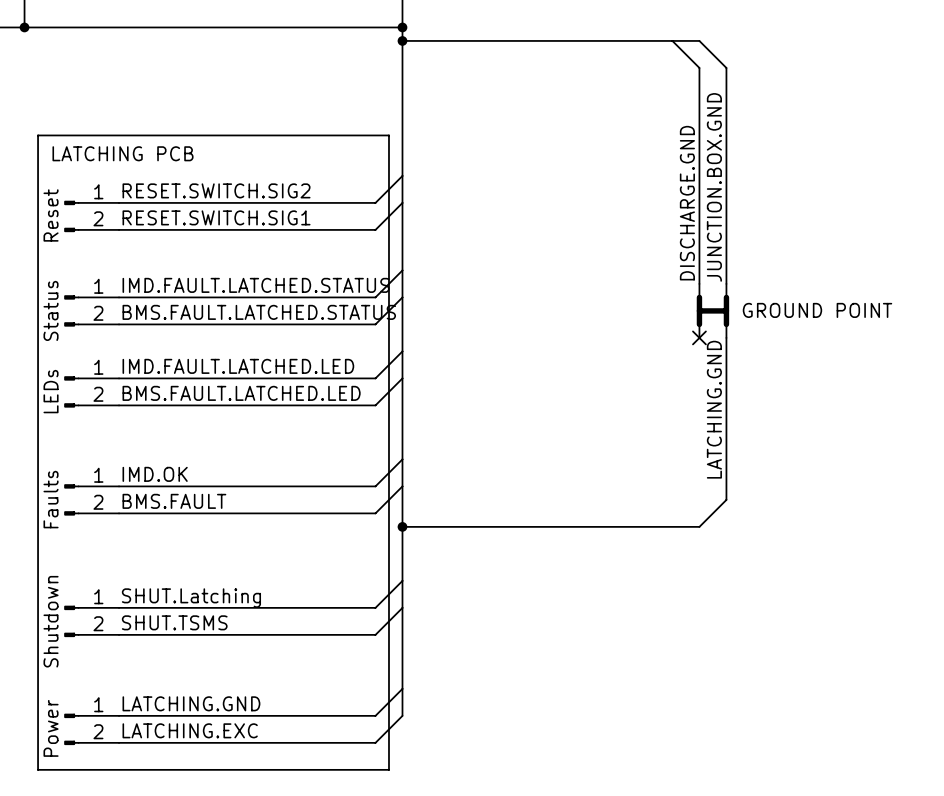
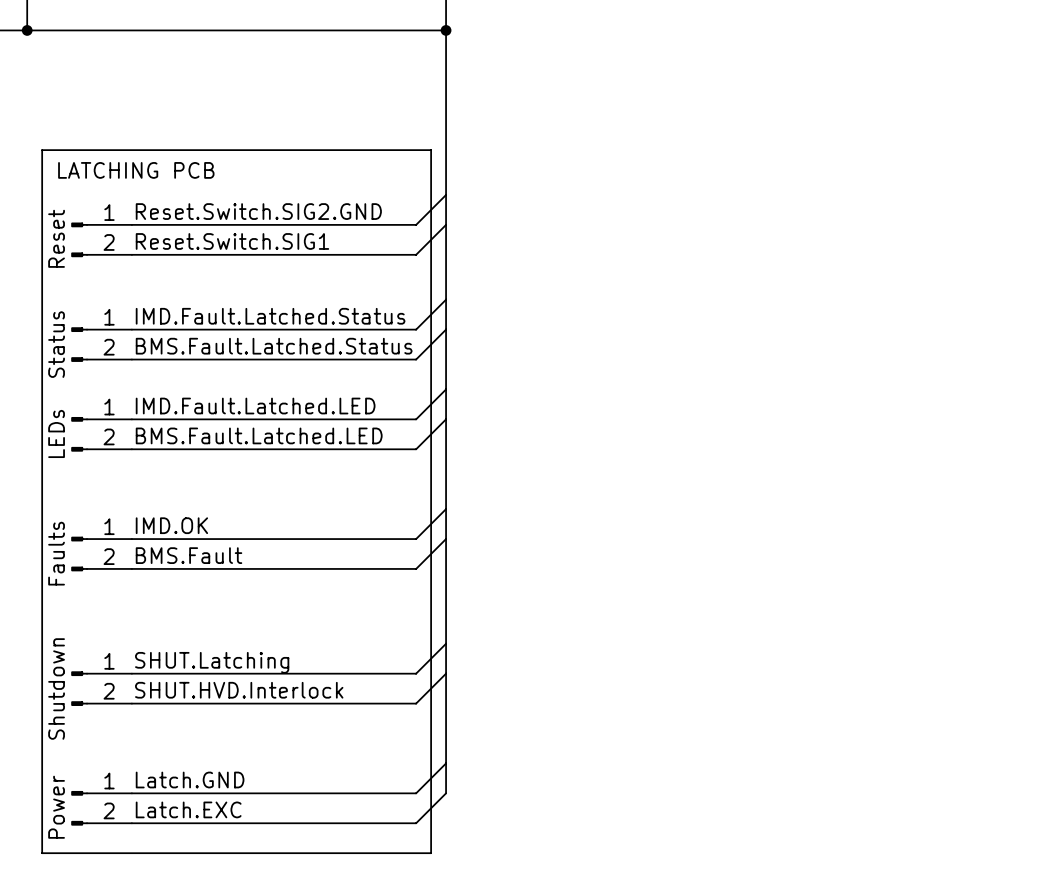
bus: (402, 40) (699, 40) -> none
junction: (402, 40) -> none
wire: (672, 40) (699, 67) (699, 283) -> none
wire: (699, 40) (726, 67) (726, 283) -> none
label: JUNCTION.BOX.GND (714, 187) -> none
label: RESET.SWITCH.SIG2 (216, 190) -> Reset.Switch.SIG2.GND (258, 211)
label: DISCHARGE.GND (687, 203) -> none
label: RESET.SWITCH.SIG1 (216, 217) -> Reset.Switch.SIG1 (232, 241)
label: IMD.FAULT.LATCHED.STATUS (256, 285) -> IMD.Fault.Latched.Status (270, 316)
part: GROUND POINT (712, 310) -> none
label: BMS.FAULT.LATCHED.STATUS (259, 312) -> BMS.Fault.Latched.Status (274, 346)
no-connect mark: (699, 337) -> none
wire: (726, 337) (726, 499) (699, 526) -> none
label: IMD.FAULT.LATCHED.LED (238, 366) -> IMD.Fault.Latched.LED (255, 406)
label: BMS.FAULT.LATCHED.LED (241, 393) -> BMS.Fault.Latched.LED (259, 435)
label: LATCHING.GND (714, 409) -> none
label: BMS.FAULT (174, 501) -> BMS.Fault (189, 555)
bus: (402, 526) (699, 526) -> none
junction: (402, 526) -> none
label: SHUT.TSMS (174, 622) -> SHUT.HVD.Interlock (239, 690)
label: LATCHING.GND (191, 703) -> Latch.GND (190, 780)
label: LATCHING.EXC (190, 730) -> Latch.EXC (188, 809)

